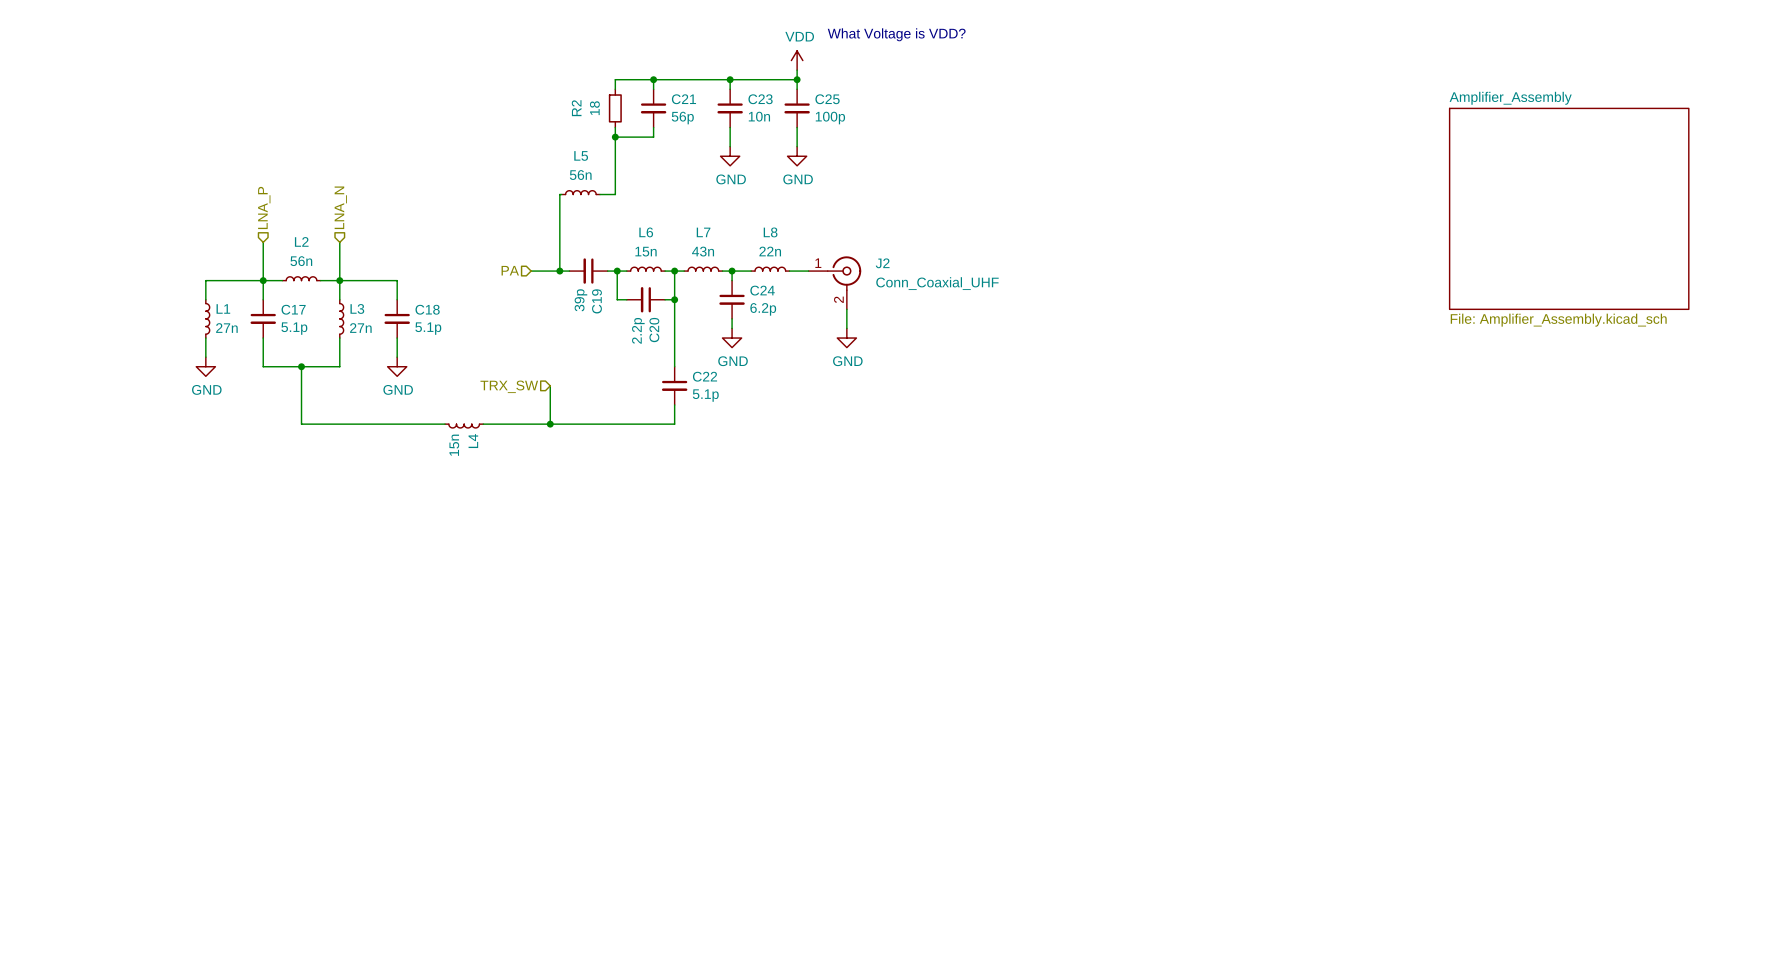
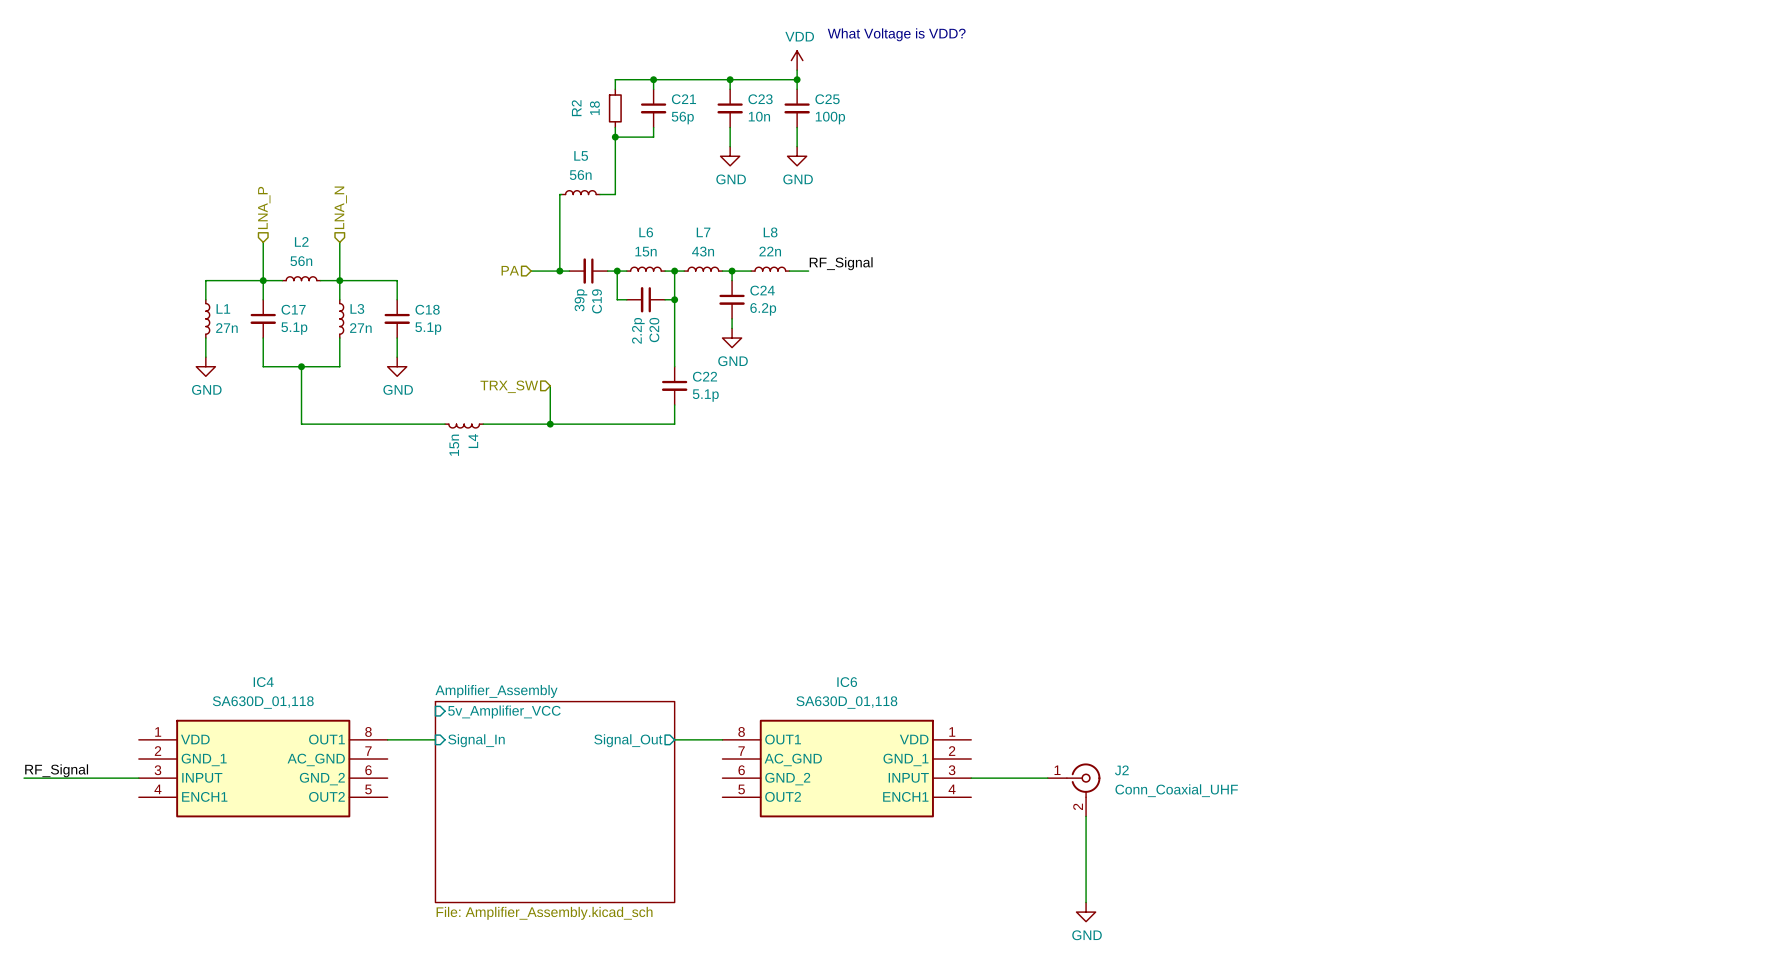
sheet Amplifier_Assembly: File: Amplifier_Assembly.kicad_sch (1569, 208) -> none
label: none -> RF_Signal (841, 263)
J2 position: (834, 282) -> (1074, 789)
wire: (846, 309) (846, 328) -> none
power symbol: GND (846, 338) -> none
sheet pin: none -> 5v_Amplifier_VCC (504, 711)
wire: none -> (387, 739) (435, 739)
wire: none -> (674, 739) (722, 739)
sheet pin: none -> Signal_In (476, 740)
sheet pin: none -> Signal_Out (628, 740)
IC4: none -> SA630D_01,118 (263, 768)
IC6: none -> SA630D_01,118 (846, 768)
label: none -> RF_Signal (56, 770)
wire: none -> (24, 778) (138, 778)
wire: none -> (971, 778) (1047, 778)
sheet Amplifier_Assembly: none -> File: Amplifier_Assembly.kicad_sch (555, 802)
wire: none -> (1086, 816) (1086, 902)
power symbol: none -> GND (1086, 912)

